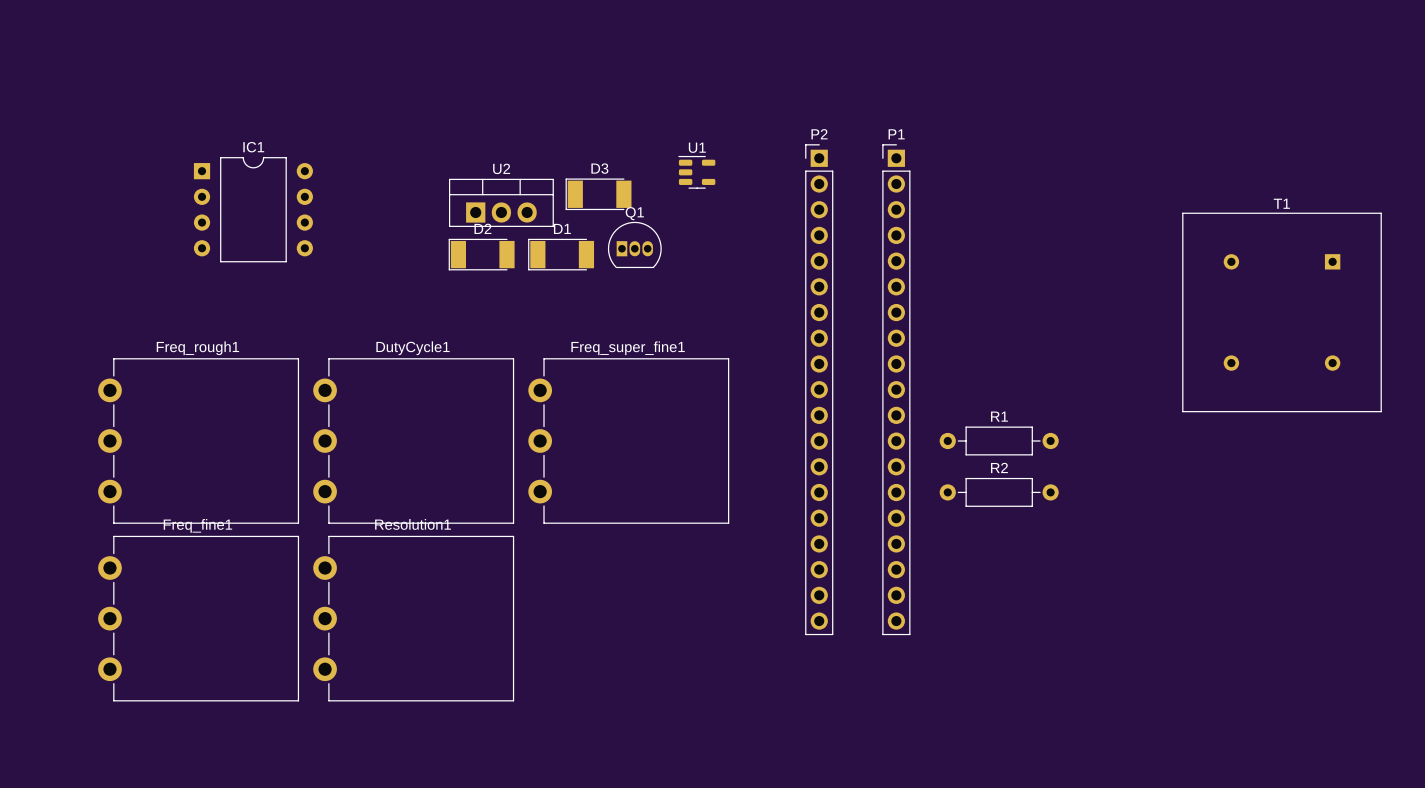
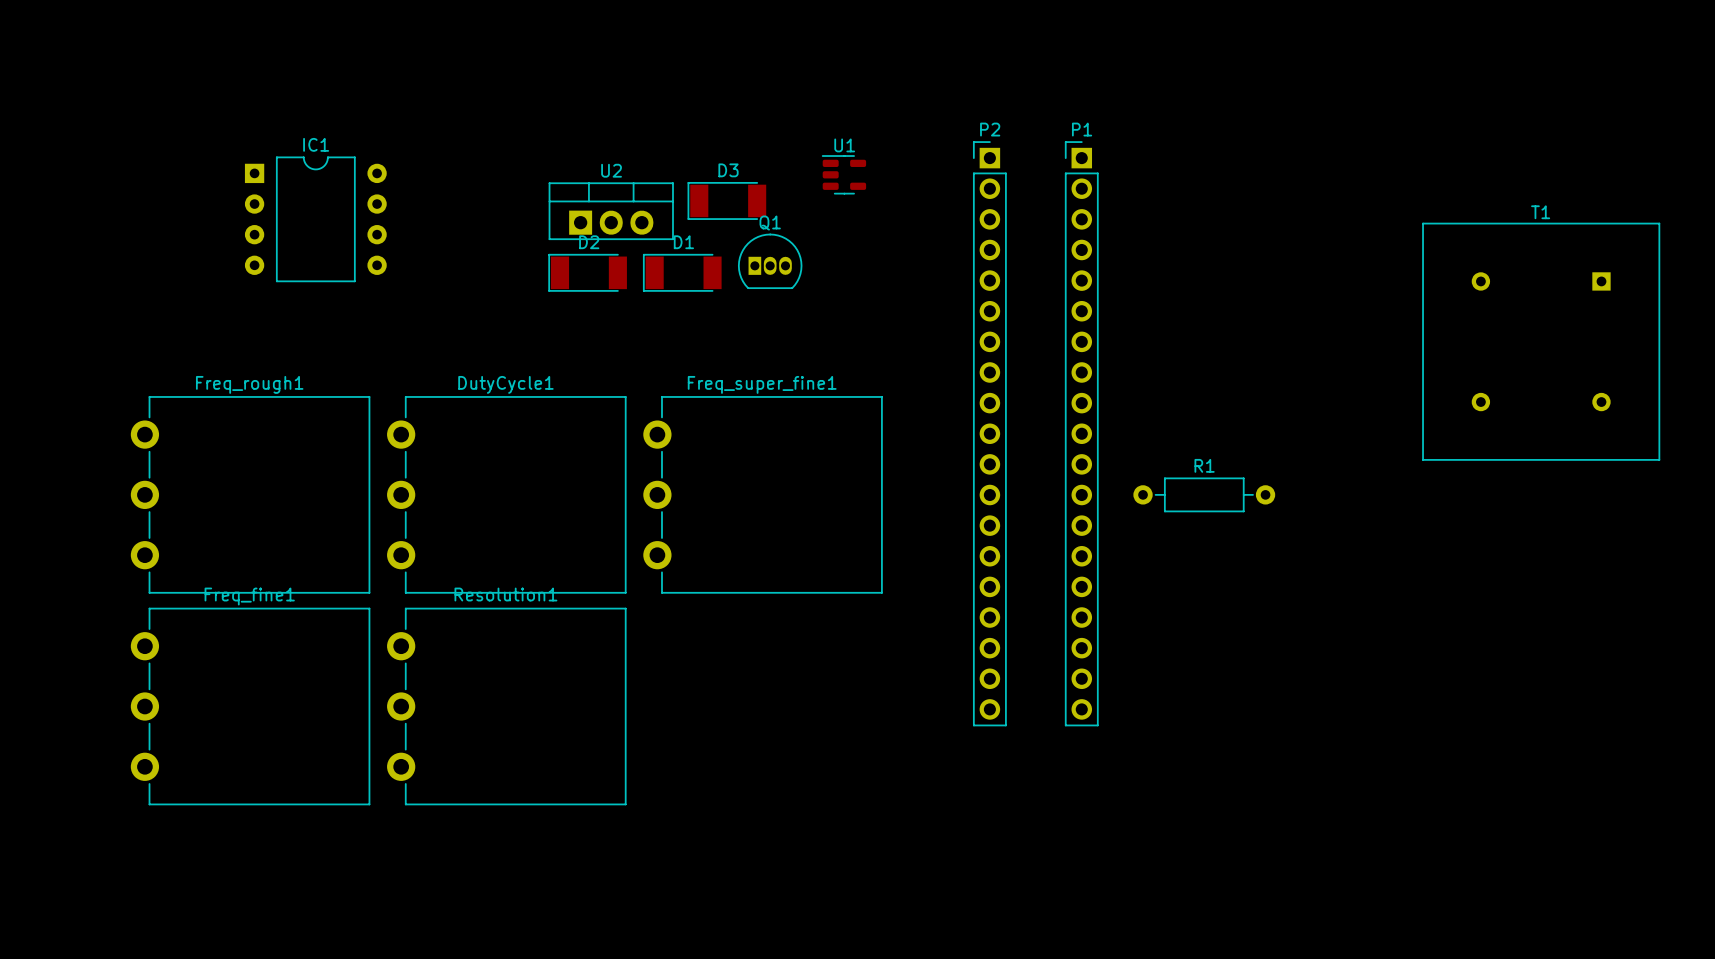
R2: (999, 492) -> none

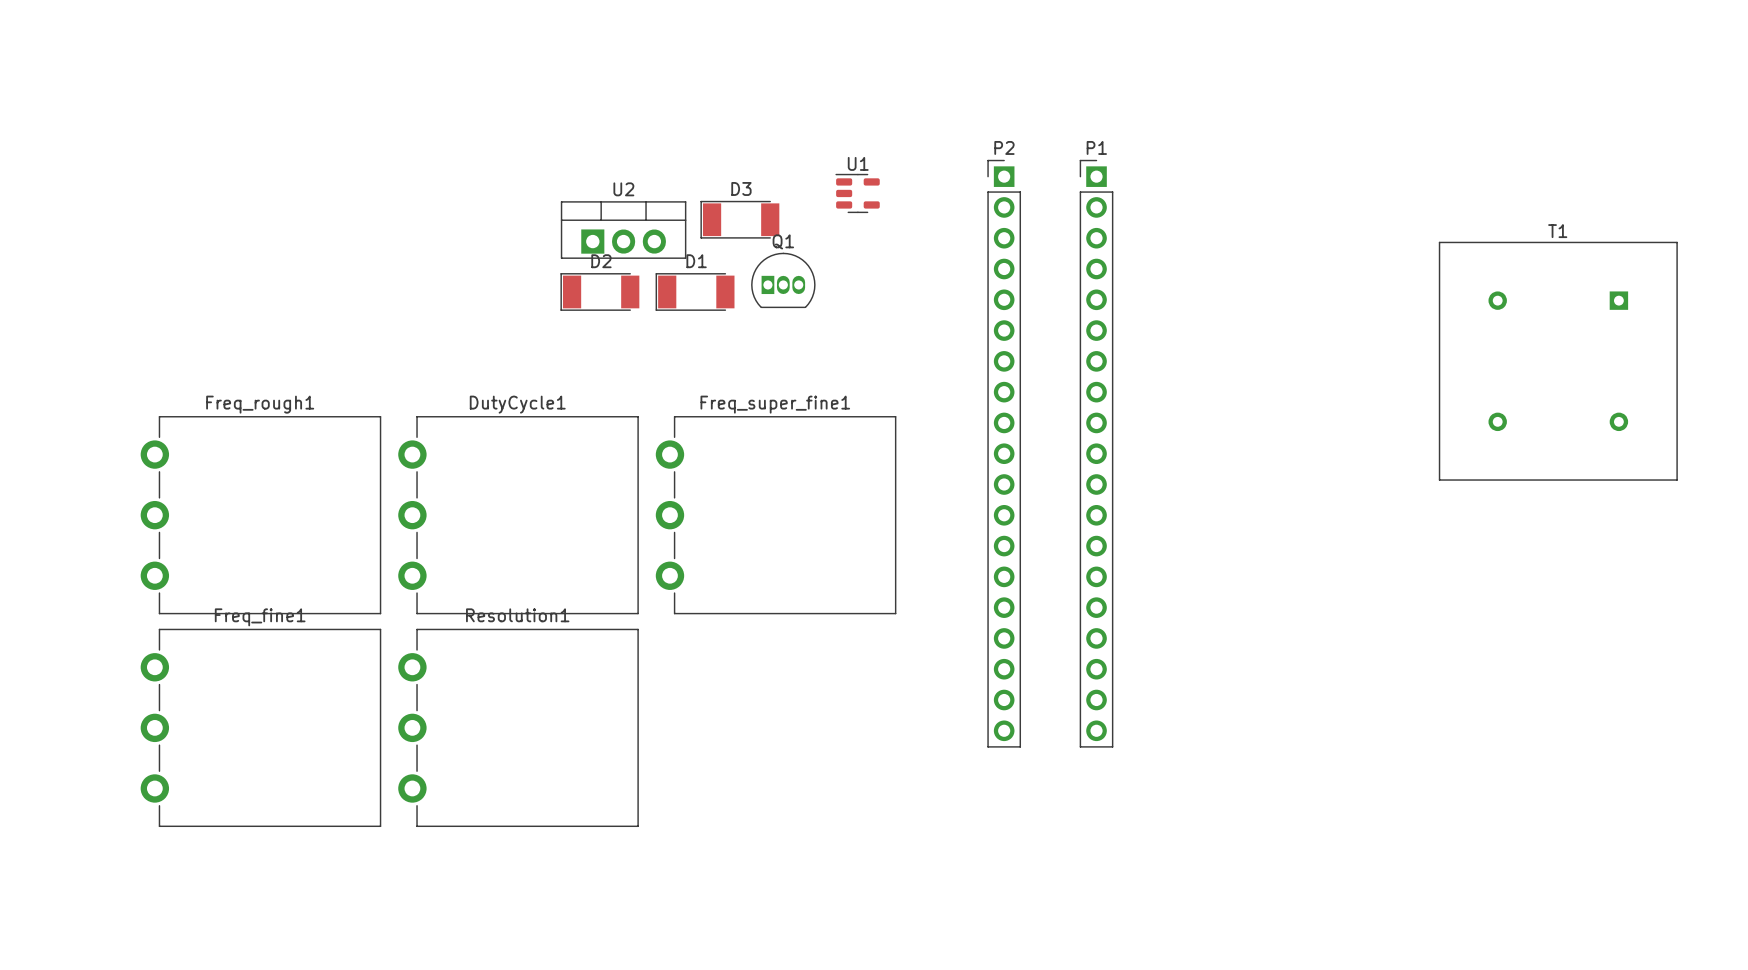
IC1: (315, 219) -> none
R1: (1204, 494) -> none

